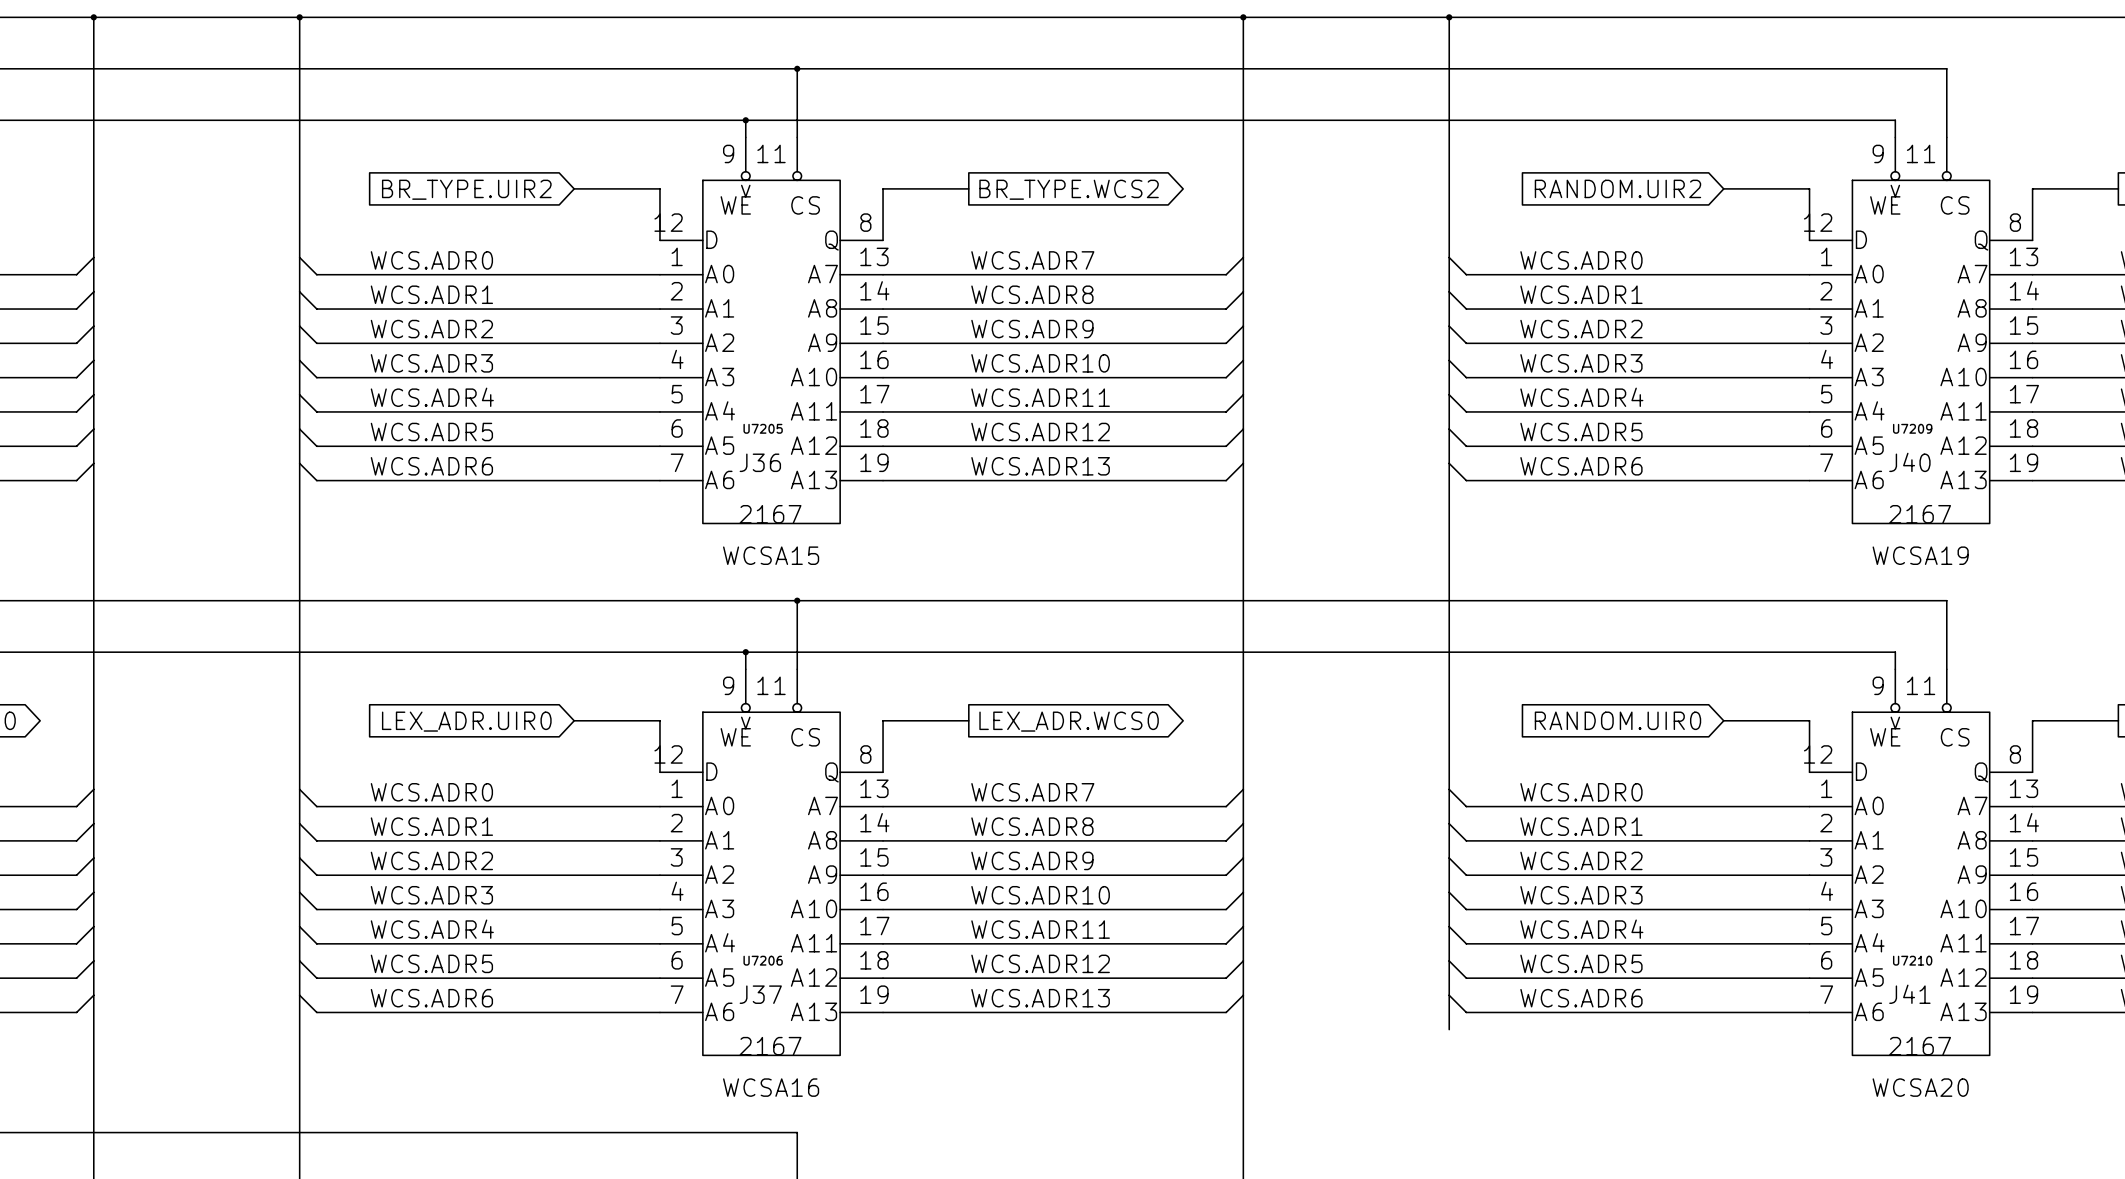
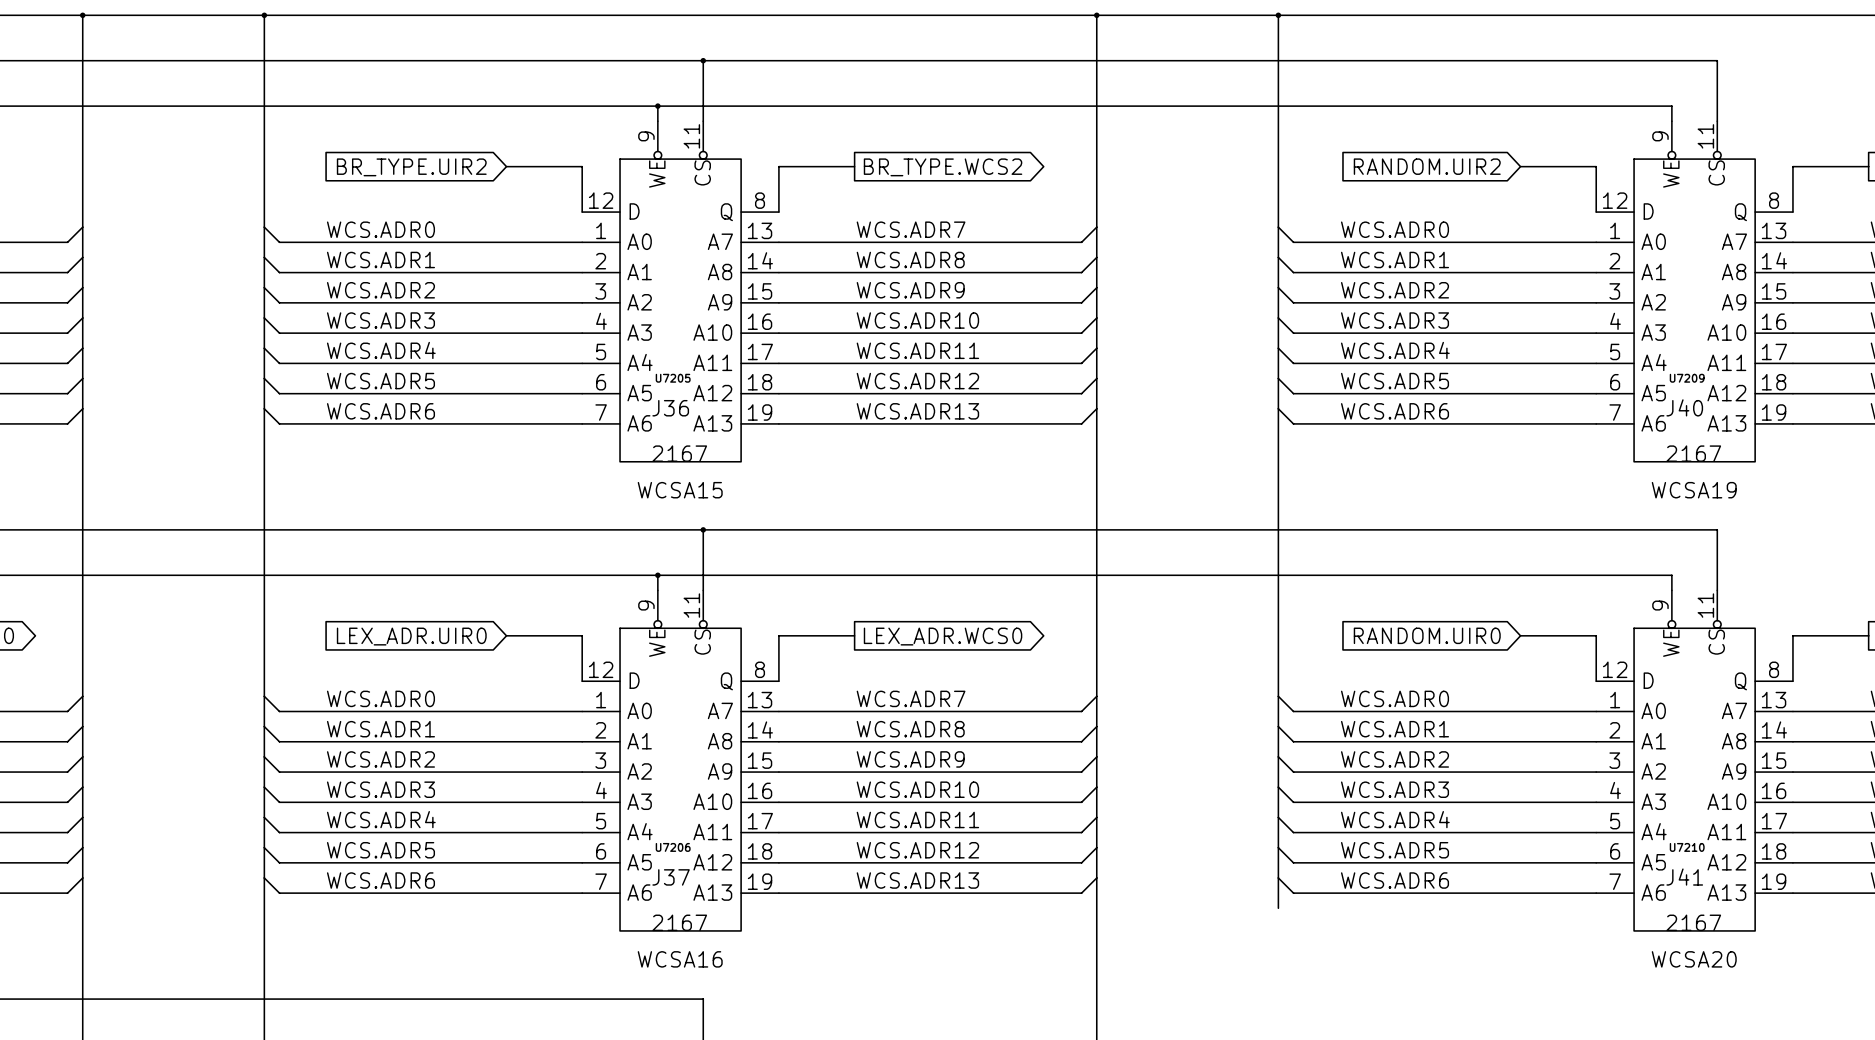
U7205 symbol: [659, 137, 884, 524] -> [582, 121, 779, 462]
U7209 symbol: [1809, 137, 2033, 524] -> [1596, 121, 1793, 462]
U7206 symbol: [659, 669, 884, 1056] -> [582, 590, 779, 931]
U7210 symbol: [1809, 669, 2033, 1056] -> [1596, 590, 1793, 931]

